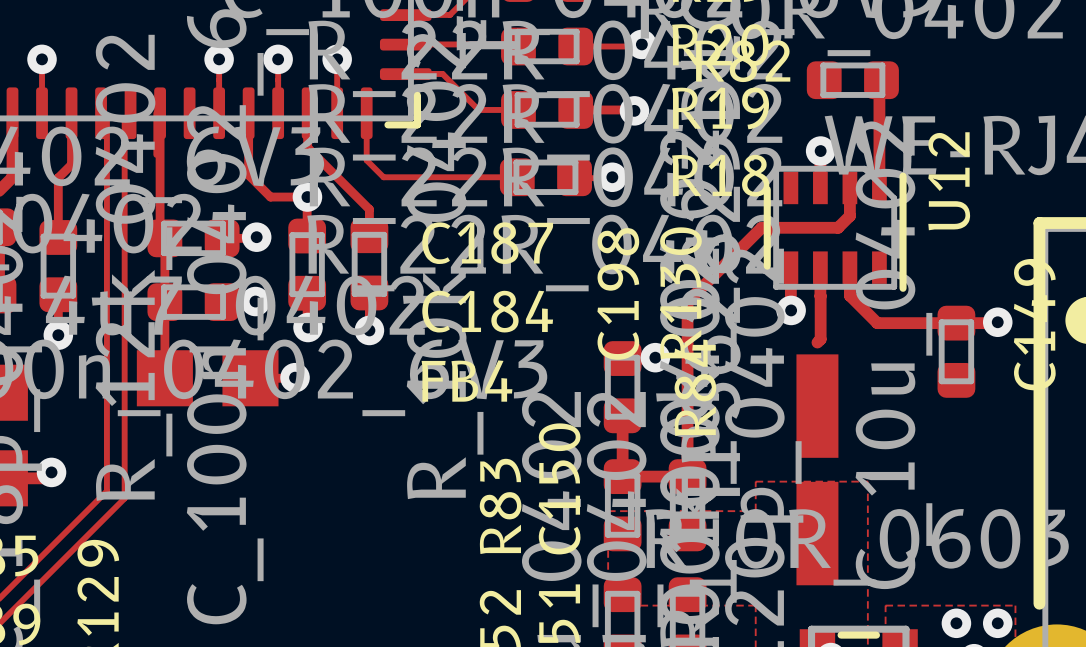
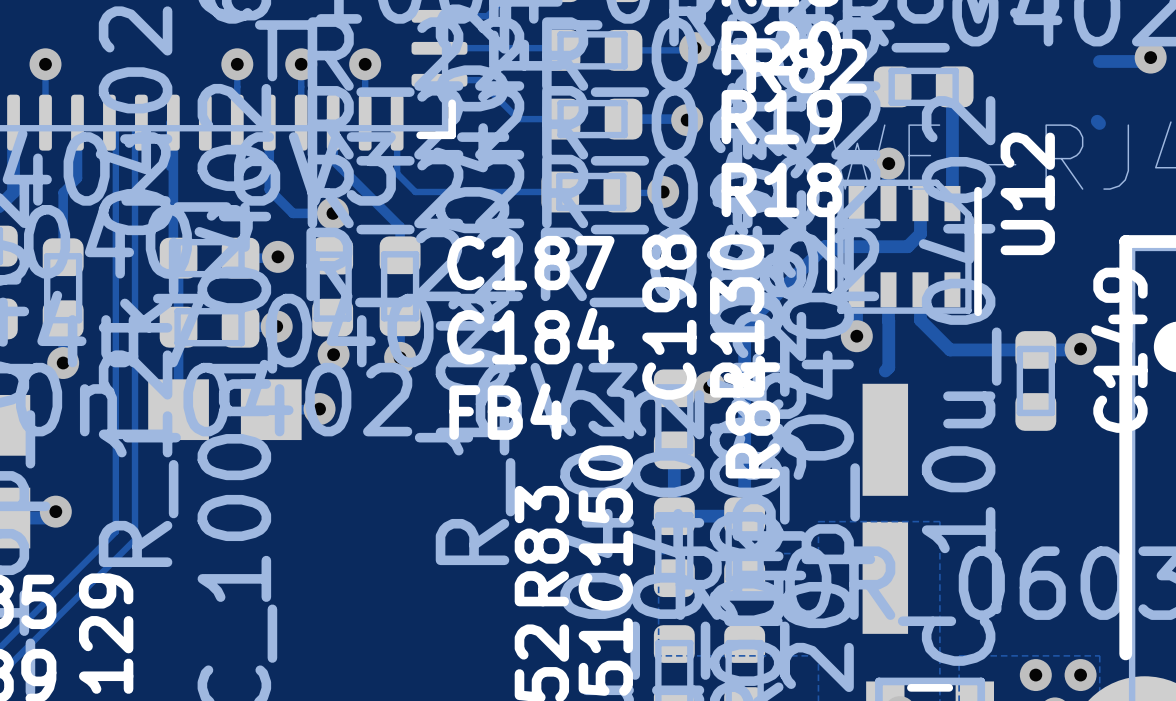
track: none -> (1150, 57) (1146, 61) (1099, 61)
via: none -> (1150, 57)
track: none -> (1097, 121) (1099, 123)

